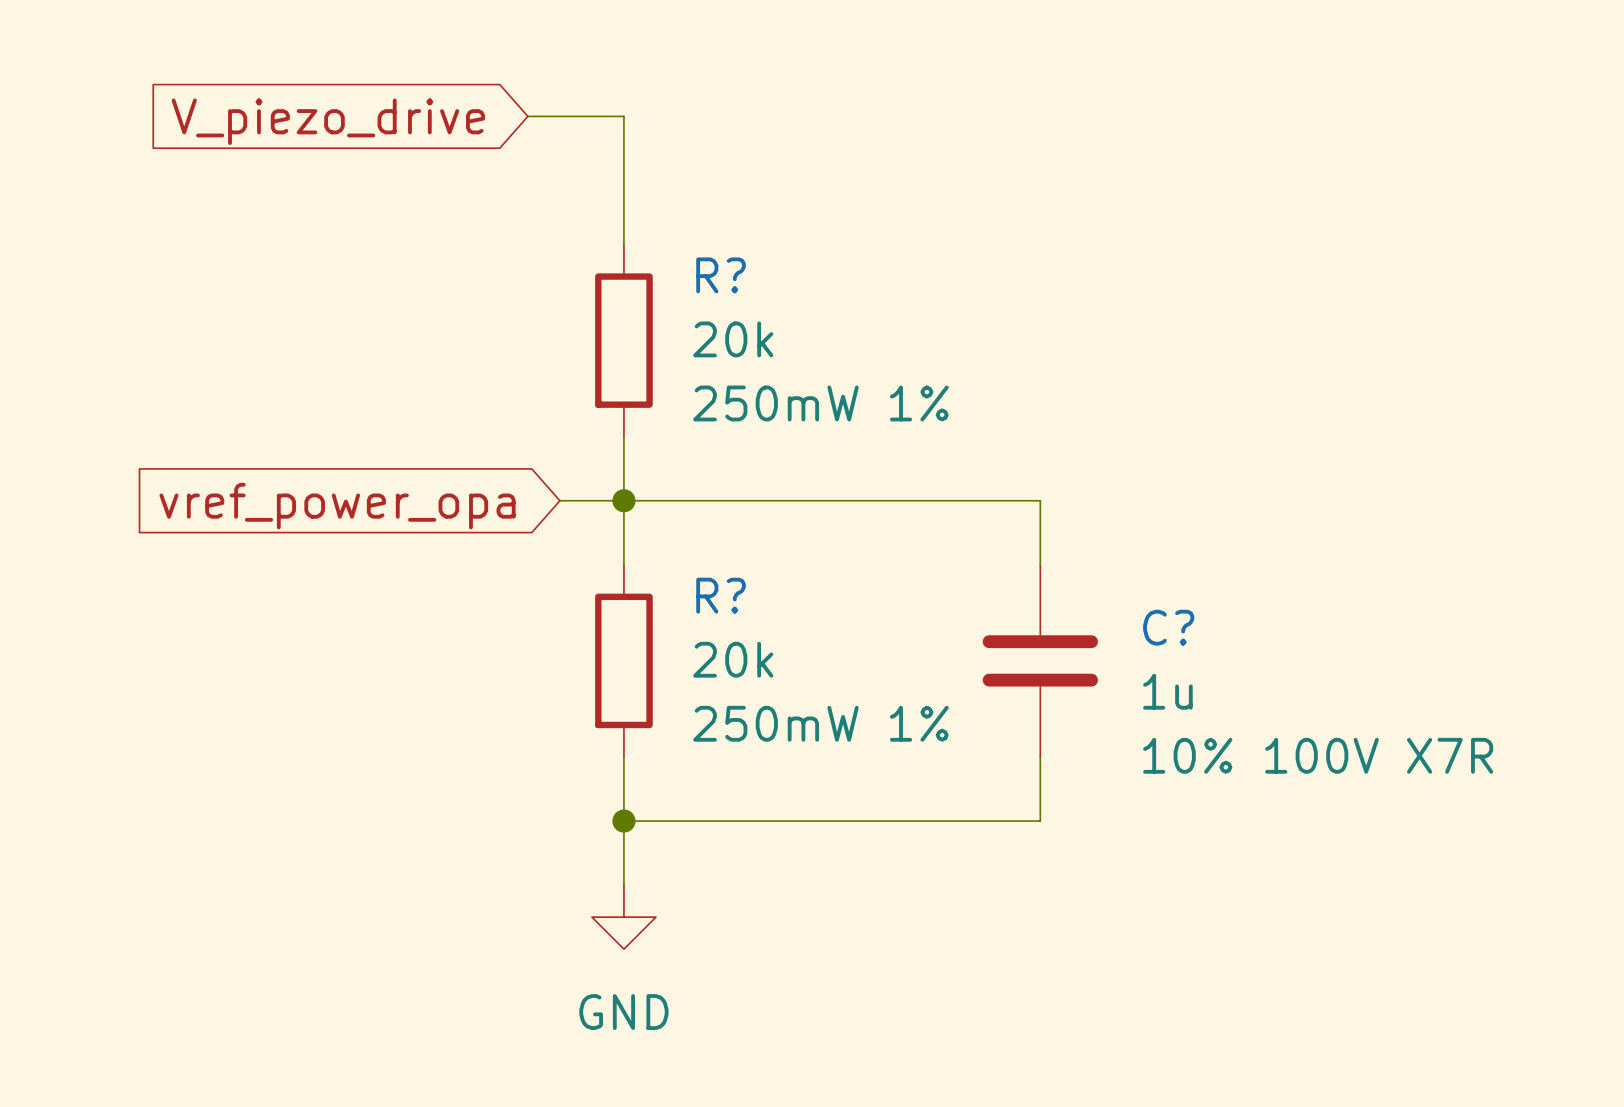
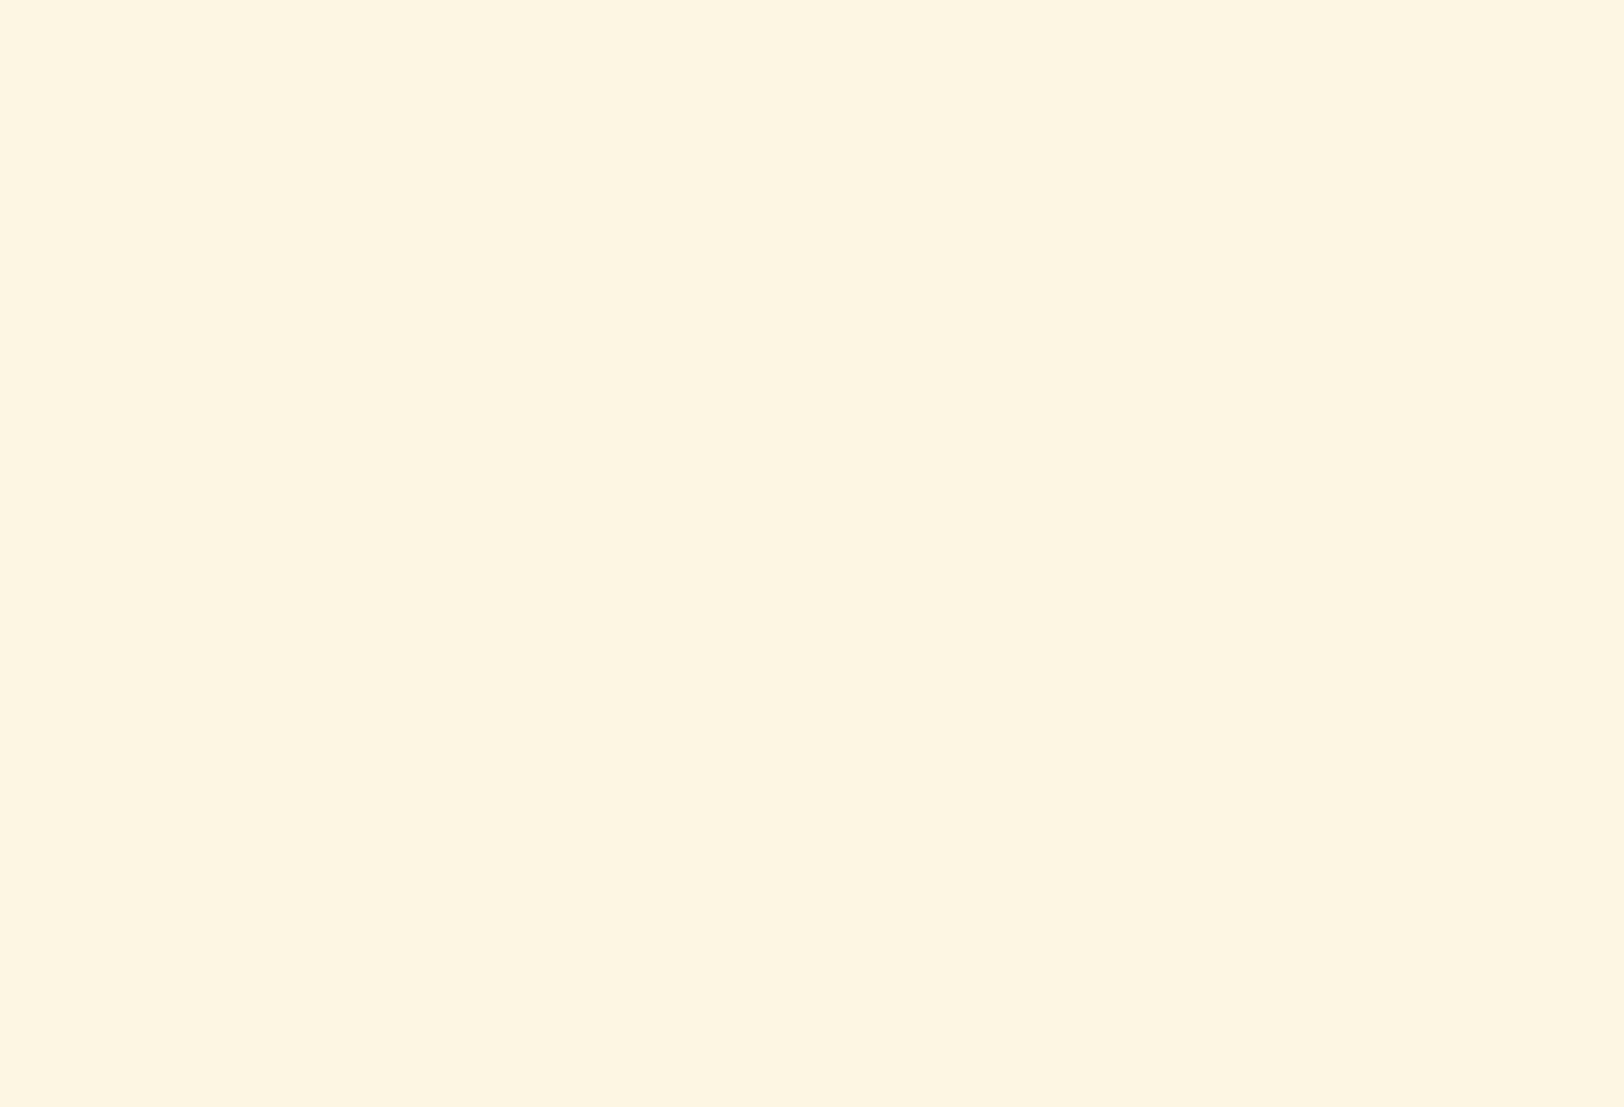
wire: (527, 116) (623, 116) (623, 244) -> none
global label: V_piezo_drive (328, 121) -> none
R?: 20k (623, 340) -> none
wire: (623, 436) (623, 564) -> none
wire: (559, 500) (1040, 500) (1040, 564) -> none
junction: (623, 500) -> none
global label: vref_power_opa (337, 506) -> none
R?: 20k (623, 660) -> none
C?: 1u (1040, 660) -> none
wire: (623, 757) (623, 885) -> none
wire: (1040, 757) (1040, 821) (623, 821) -> none
junction: (623, 821) -> none
power symbol: GND (623, 917) -> none

